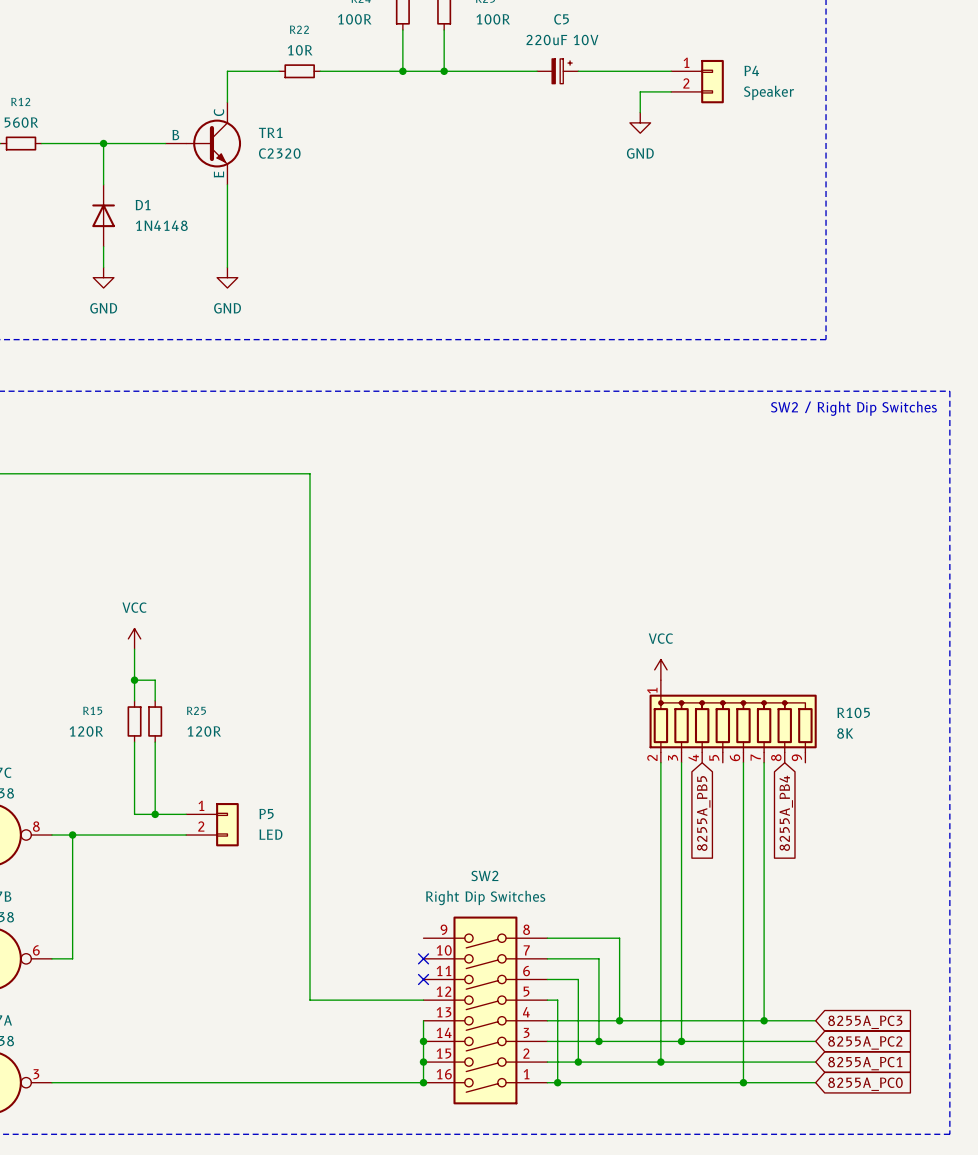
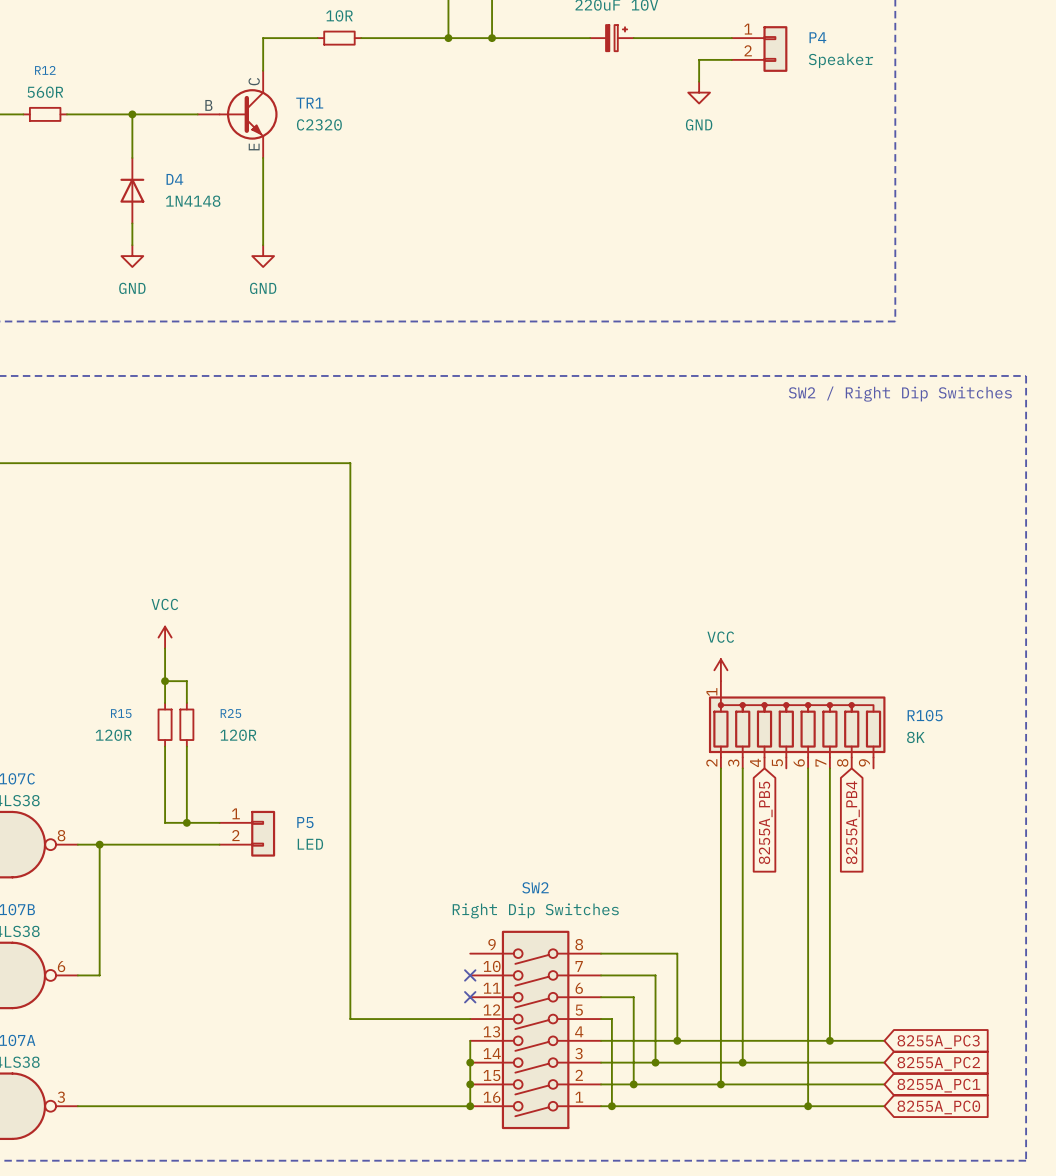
D1 name: D1 (143, 205) -> D4 (174, 179)

